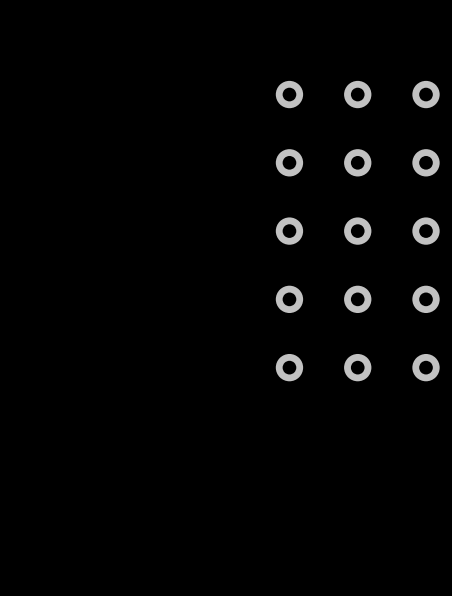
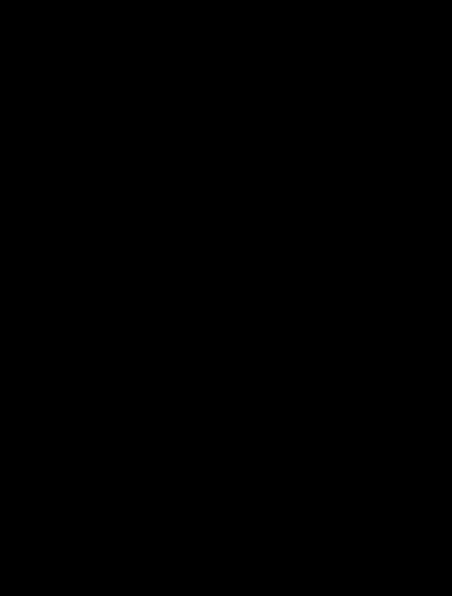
via: (289, 94) -> none
via: (357, 94) -> none
via: (426, 94) -> none
via: (289, 162) -> none
via: (357, 162) -> none
via: (426, 162) -> none
via: (289, 231) -> none
via: (357, 231) -> none
via: (426, 231) -> none
via: (289, 299) -> none
via: (357, 299) -> none
via: (426, 299) -> none
via: (289, 367) -> none
via: (357, 367) -> none
via: (426, 367) -> none

